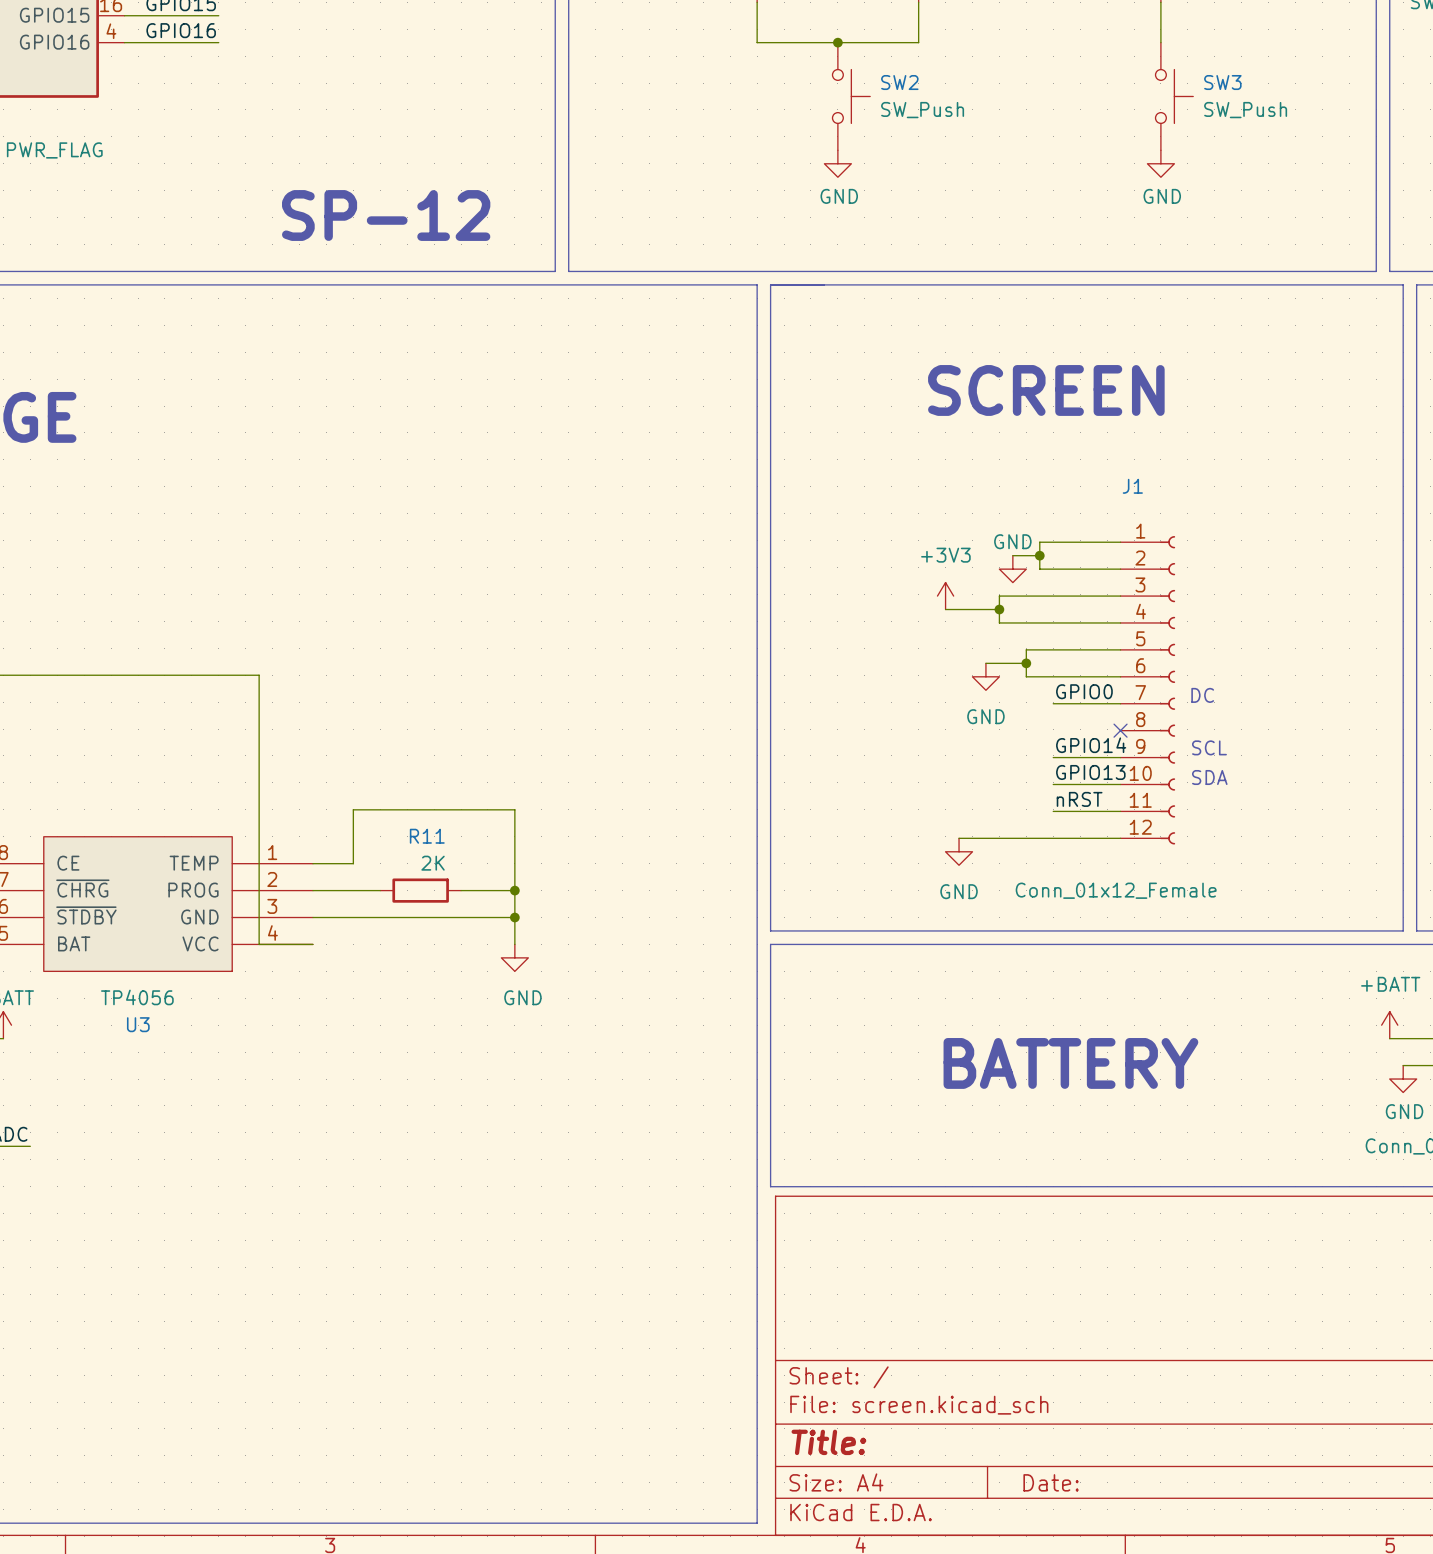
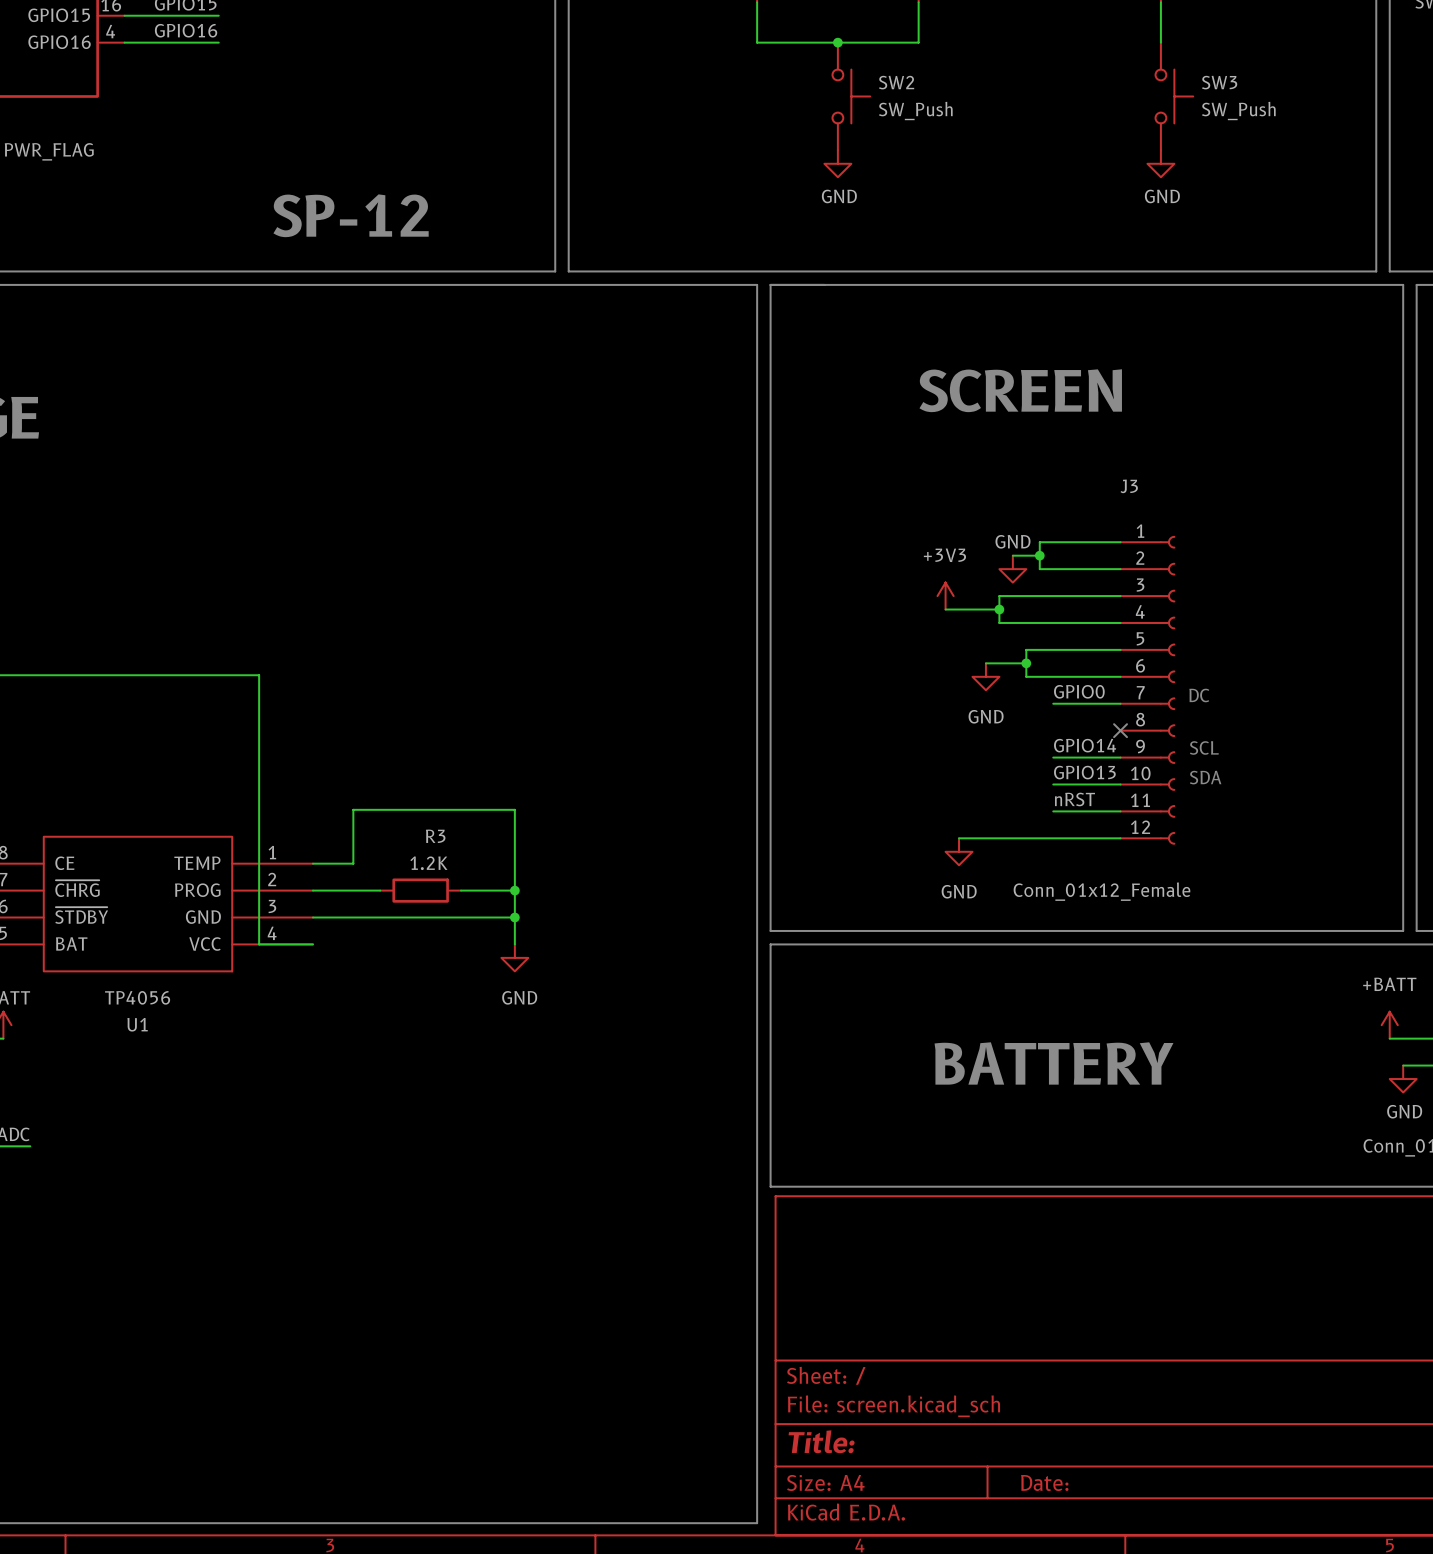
J1 name: J1 (1132, 486) -> J3 (1129, 486)
R11 name: R11 (427, 836) -> R3 (435, 836)
R11 value: 2K (433, 863) -> 1.2K (428, 863)
U3 name: U3 (138, 1024) -> U1 (137, 1024)

